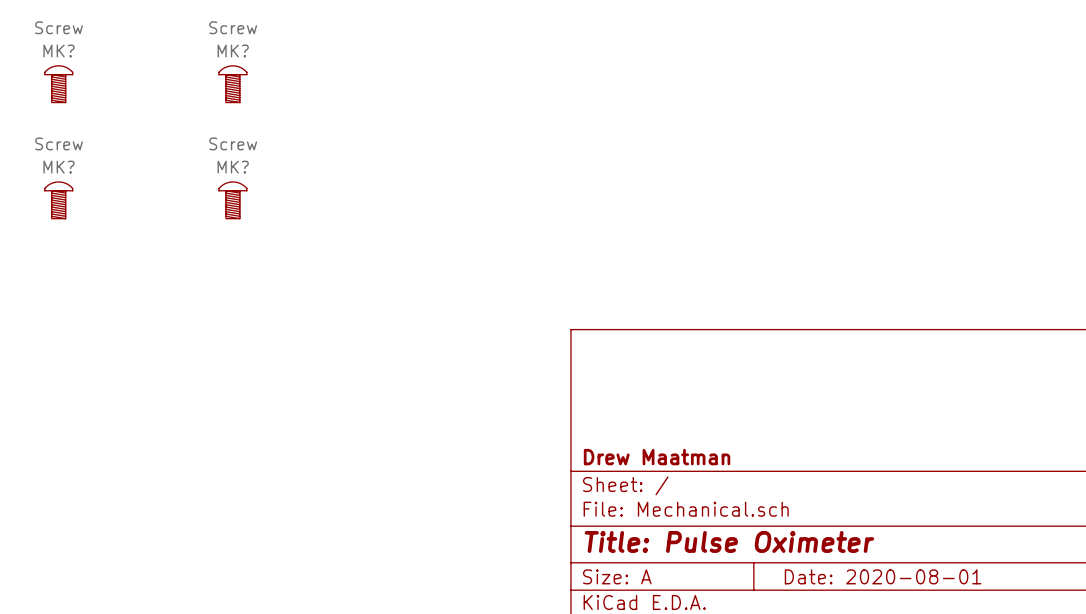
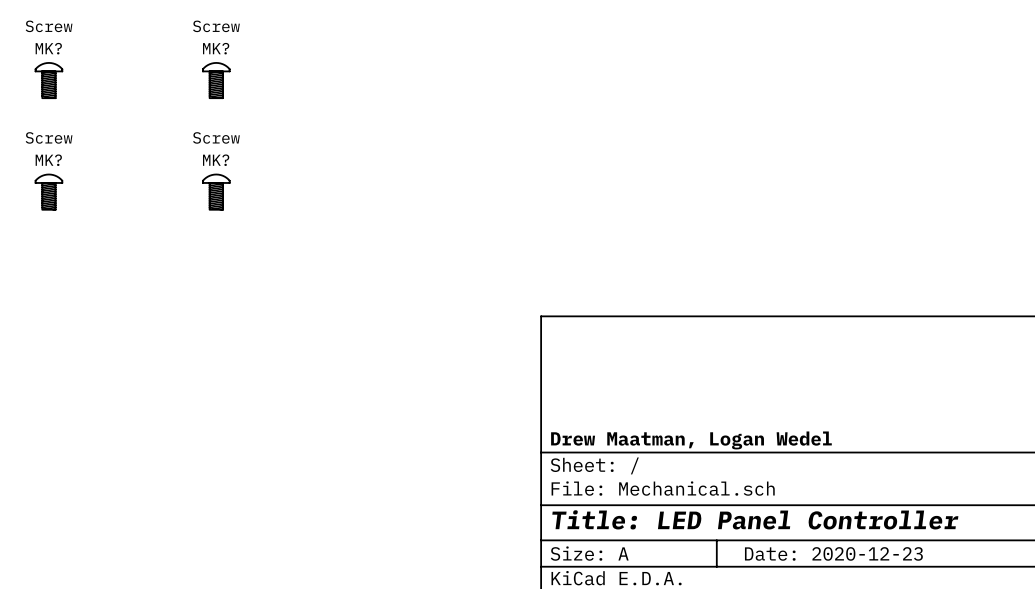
title block: Drew Maatman (657, 457) -> Drew Maatman, Logan Wedel (691, 440)
title block: Title: Pulse Oximeter (729, 541) -> Title: LED Panel Controller (755, 519)
title block: Date: 2020-08-01 (883, 576) -> Date: 2020-12-23 (833, 553)

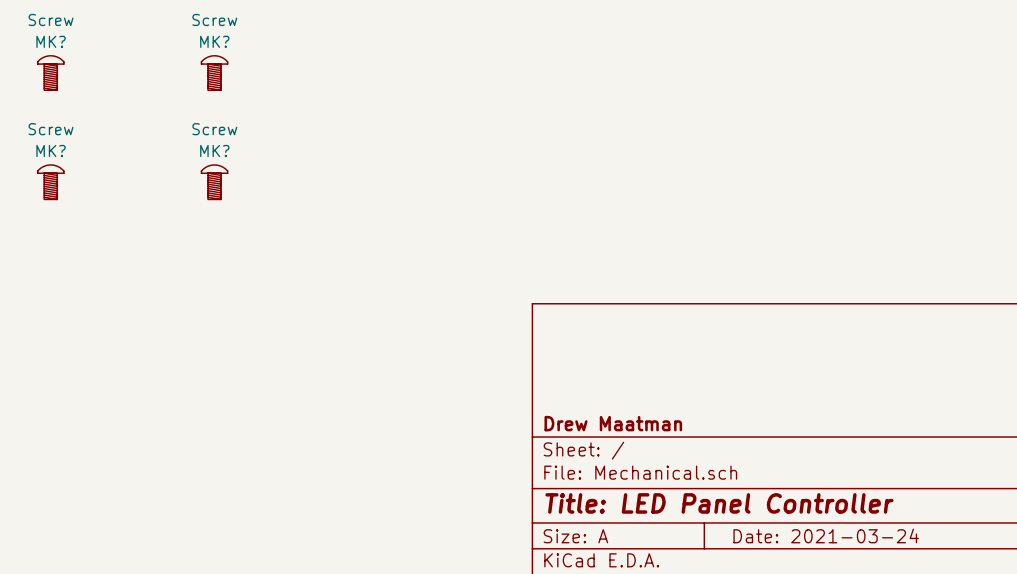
title block: Drew Maatman, Logan Wedel (691, 440) -> Drew Maatman (613, 423)
title block: Date: 2020-12-23 (833, 553) -> Date: 2021-03-24 (826, 535)

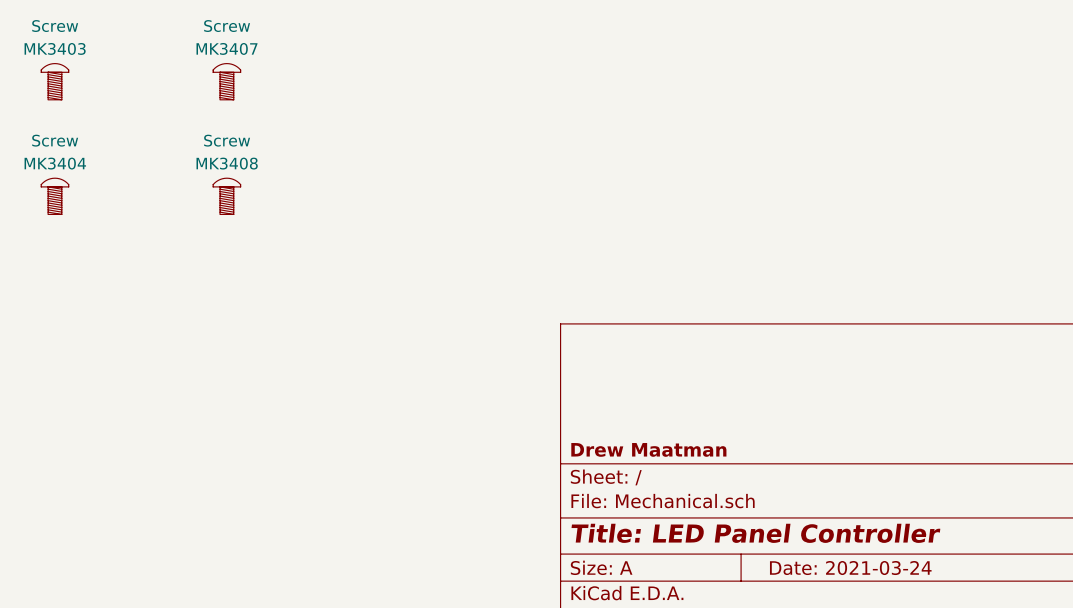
MK? name: MK? (51, 41) -> MK3403 (55, 48)
MK? name: MK? (214, 41) -> MK3407 (227, 48)
MK? name: MK? (51, 151) -> MK3404 (55, 163)
MK? name: MK? (214, 151) -> MK3408 (227, 163)

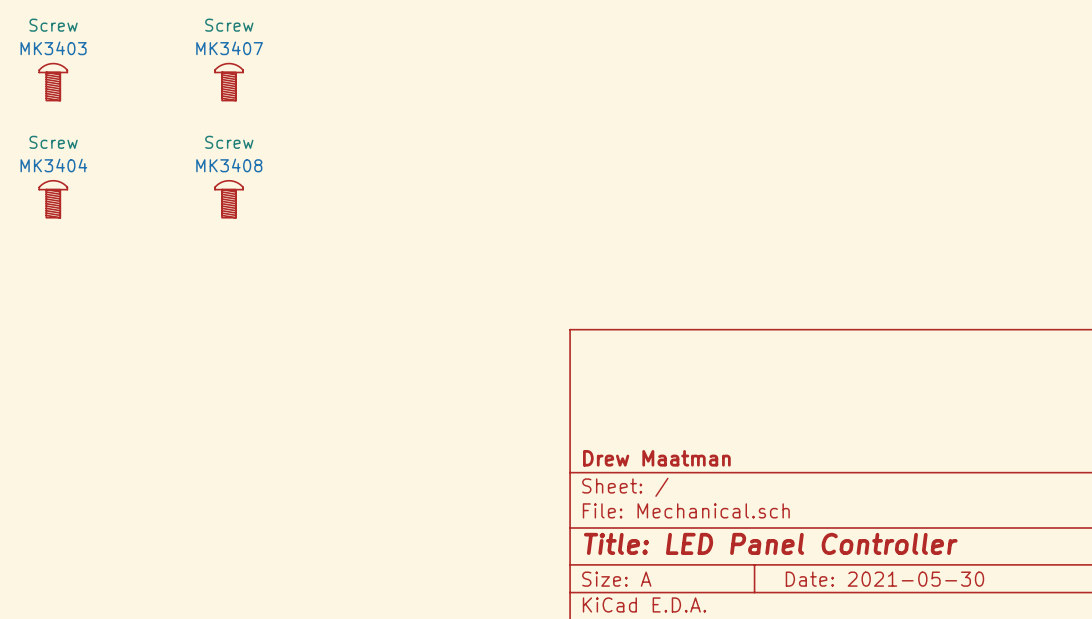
title block: Date: 2021-03-24 (850, 568) -> Date: 2021-05-30 (884, 579)

